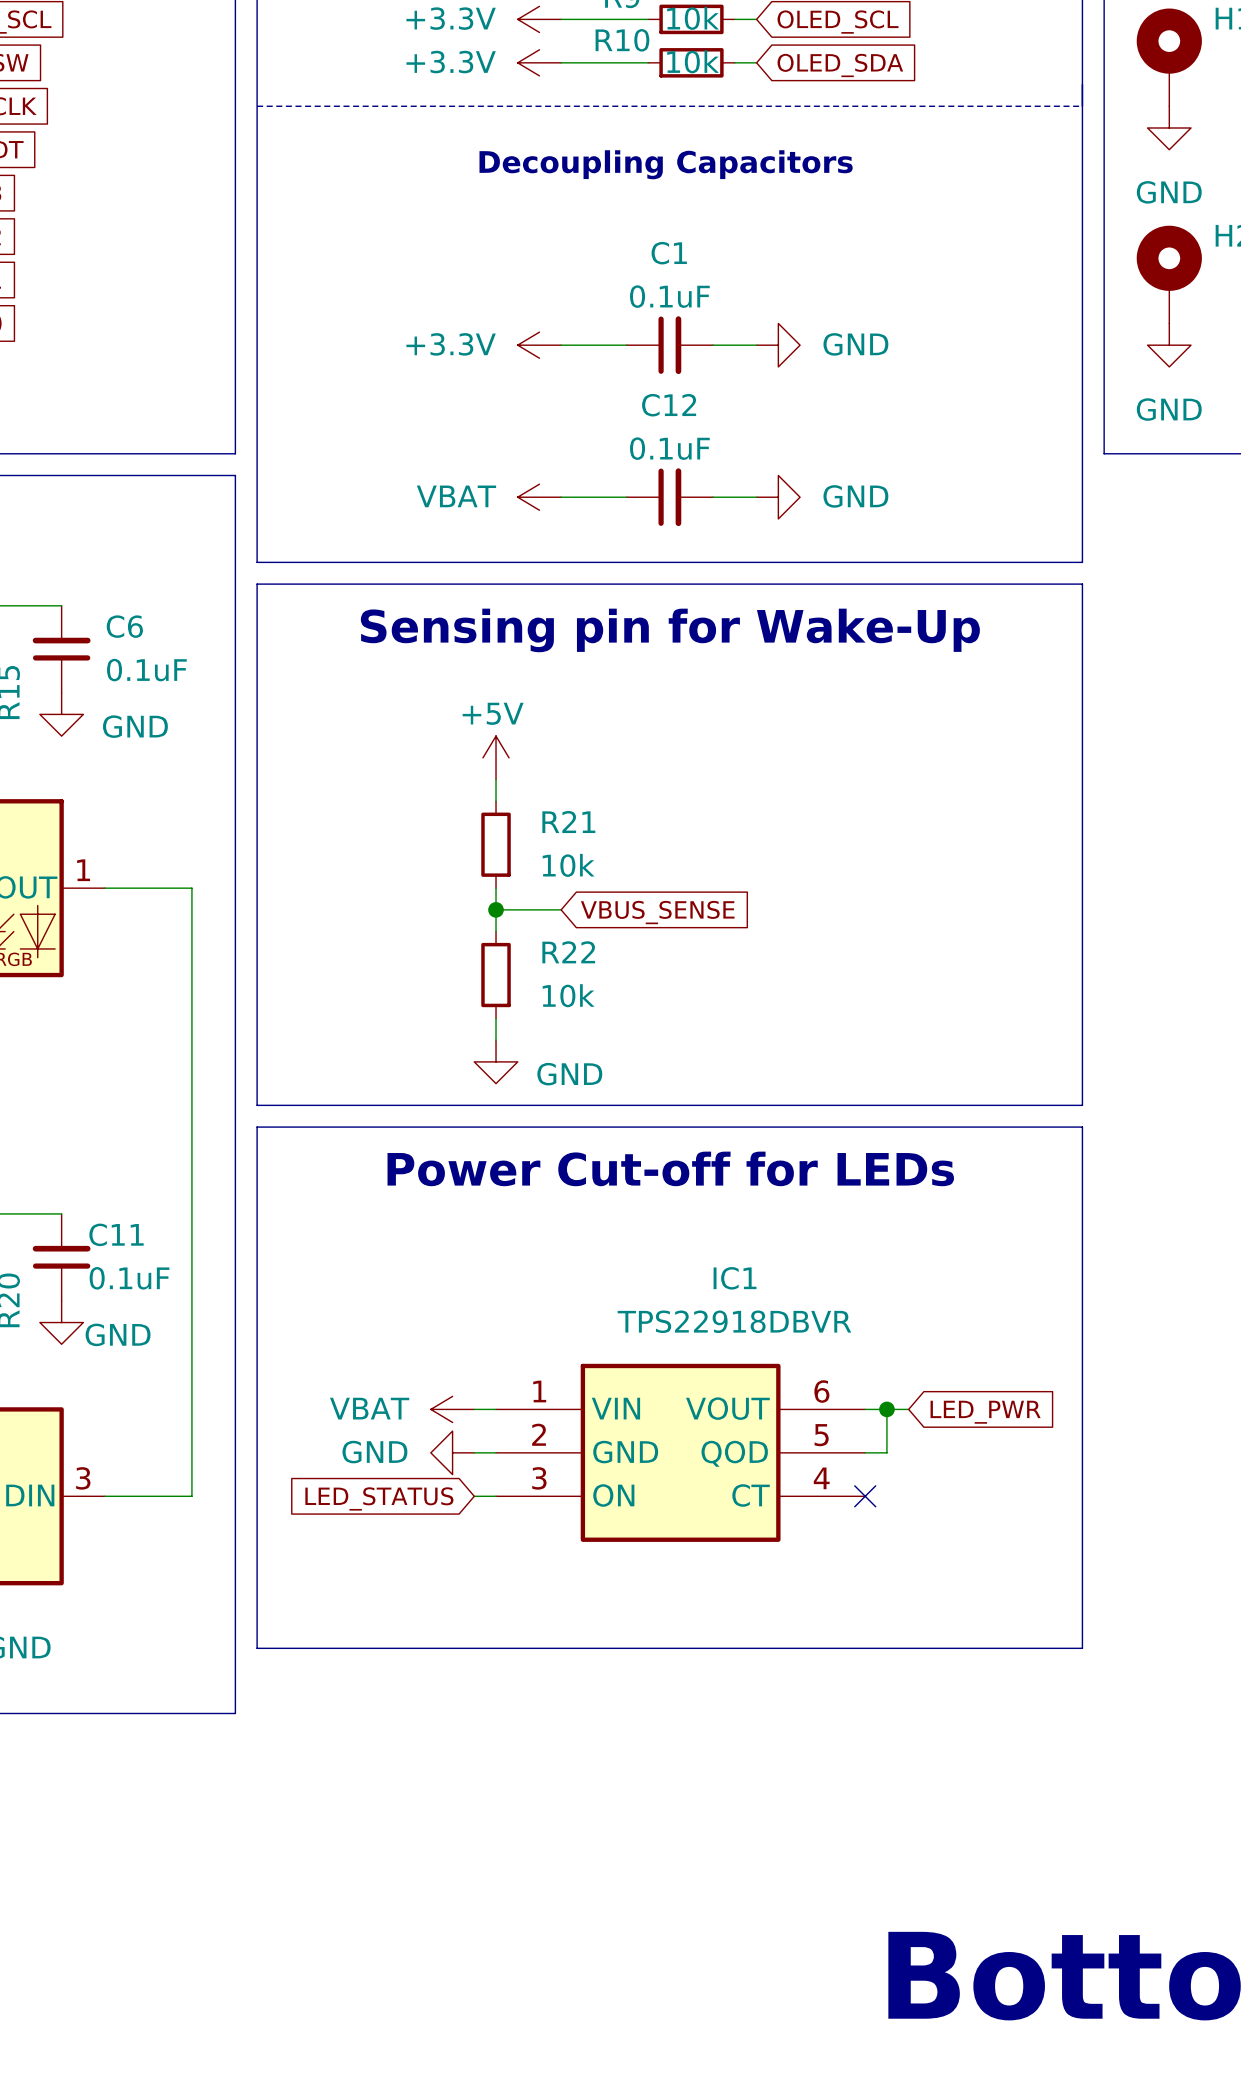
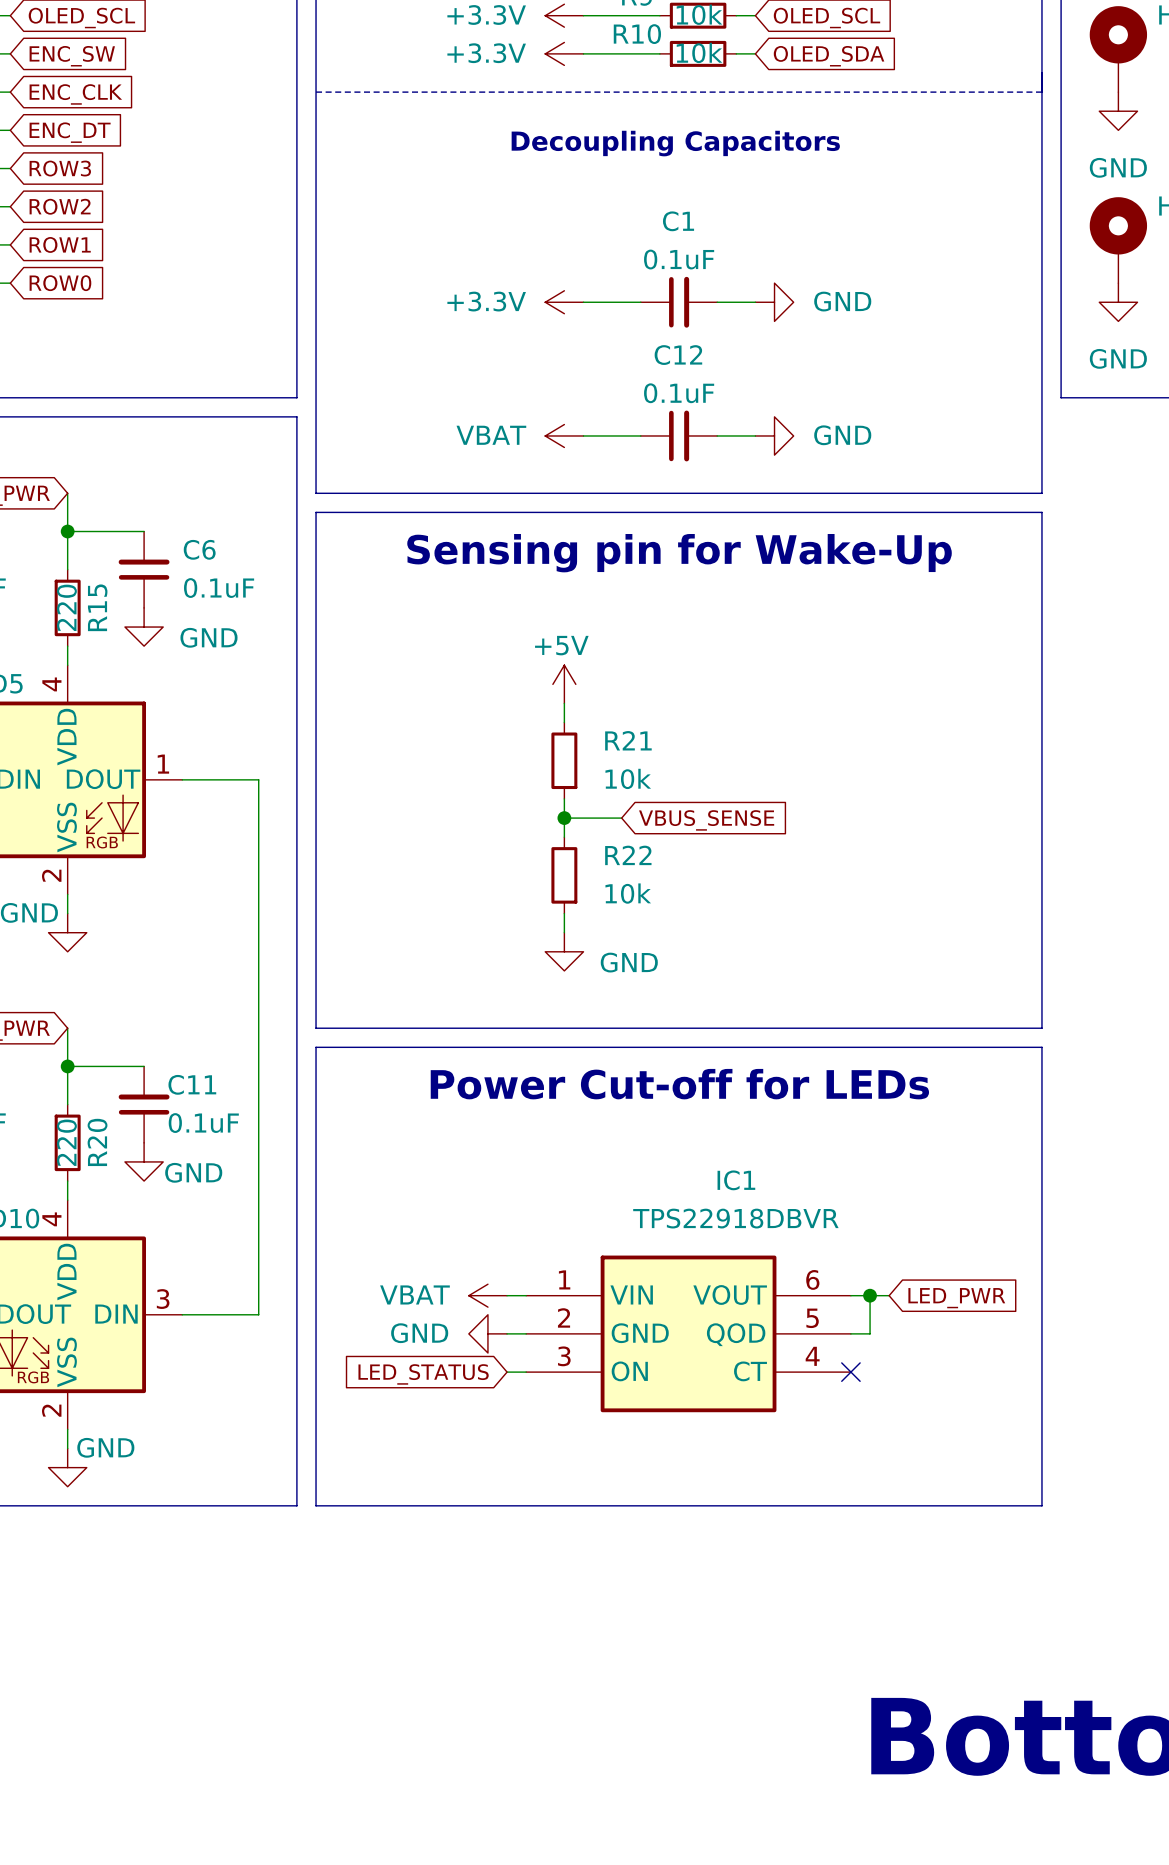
power symbol position: +5V (496, 757) -> +5V (564, 684)
wire: (496, 779) (496, 801) -> (564, 703) (564, 722)
R21 position: (496, 844) -> (564, 760)
wire: (496, 888) (496, 931) -> (564, 798) (564, 837)
wire: (496, 909) (561, 909) -> (564, 818) (621, 818)
junction position: (496, 909) -> (564, 818)
global label position: VBUS_SENSE (657, 912) -> VBUS_SENSE (706, 820)
R22 position: (496, 975) -> (564, 875)
wire: (496, 1018) (496, 1040) -> (564, 913) (564, 932)
power symbol position: GND (496, 1061) -> GND (564, 951)
line: (257, 1105) (1082, 1105) -> (316, 970) (316, 990)
line: (257, 1127) (1082, 1127) -> (1041, 970) (1041, 990)
text position: Power Cut-off for LEDs (670, 1168) -> Power Cut-off for LEDs (679, 1084)
line: (257, 1170) (257, 1192) -> (316, 1028) (1041, 1028)
line: (1082, 1170) (1082, 1192) -> (316, 1047) (1041, 1047)
power symbol position: VBAT (452, 1409) -> VBAT (487, 1295)
wire: (474, 1409) (496, 1409) -> (507, 1295) (526, 1295)
wire: (865, 1409) (908, 1409) -> (850, 1295) (889, 1295)
wire: (886, 1409) (886, 1452) (865, 1452) -> (870, 1295) (870, 1333) (850, 1333)
junction position: (886, 1409) -> (870, 1295)
global label position: LED_PWR (985, 1412) -> LED_PWR (956, 1298)
power symbol position: GND (452, 1452) -> GND (487, 1333)
wire: (474, 1452) (496, 1452) -> (507, 1333) (526, 1333)
IC1 position: (680, 1452) -> (688, 1333)
wire: (474, 1496) (496, 1496) -> (507, 1372) (526, 1372)
no-connect mark position: (865, 1496) -> (850, 1372)
global label position: LED_STATUS (379, 1498) -> LED_STATUS (423, 1374)
line: (257, 1648) (1082, 1648) -> (316, 1448) (316, 1505) (1041, 1505) (1041, 1448)

